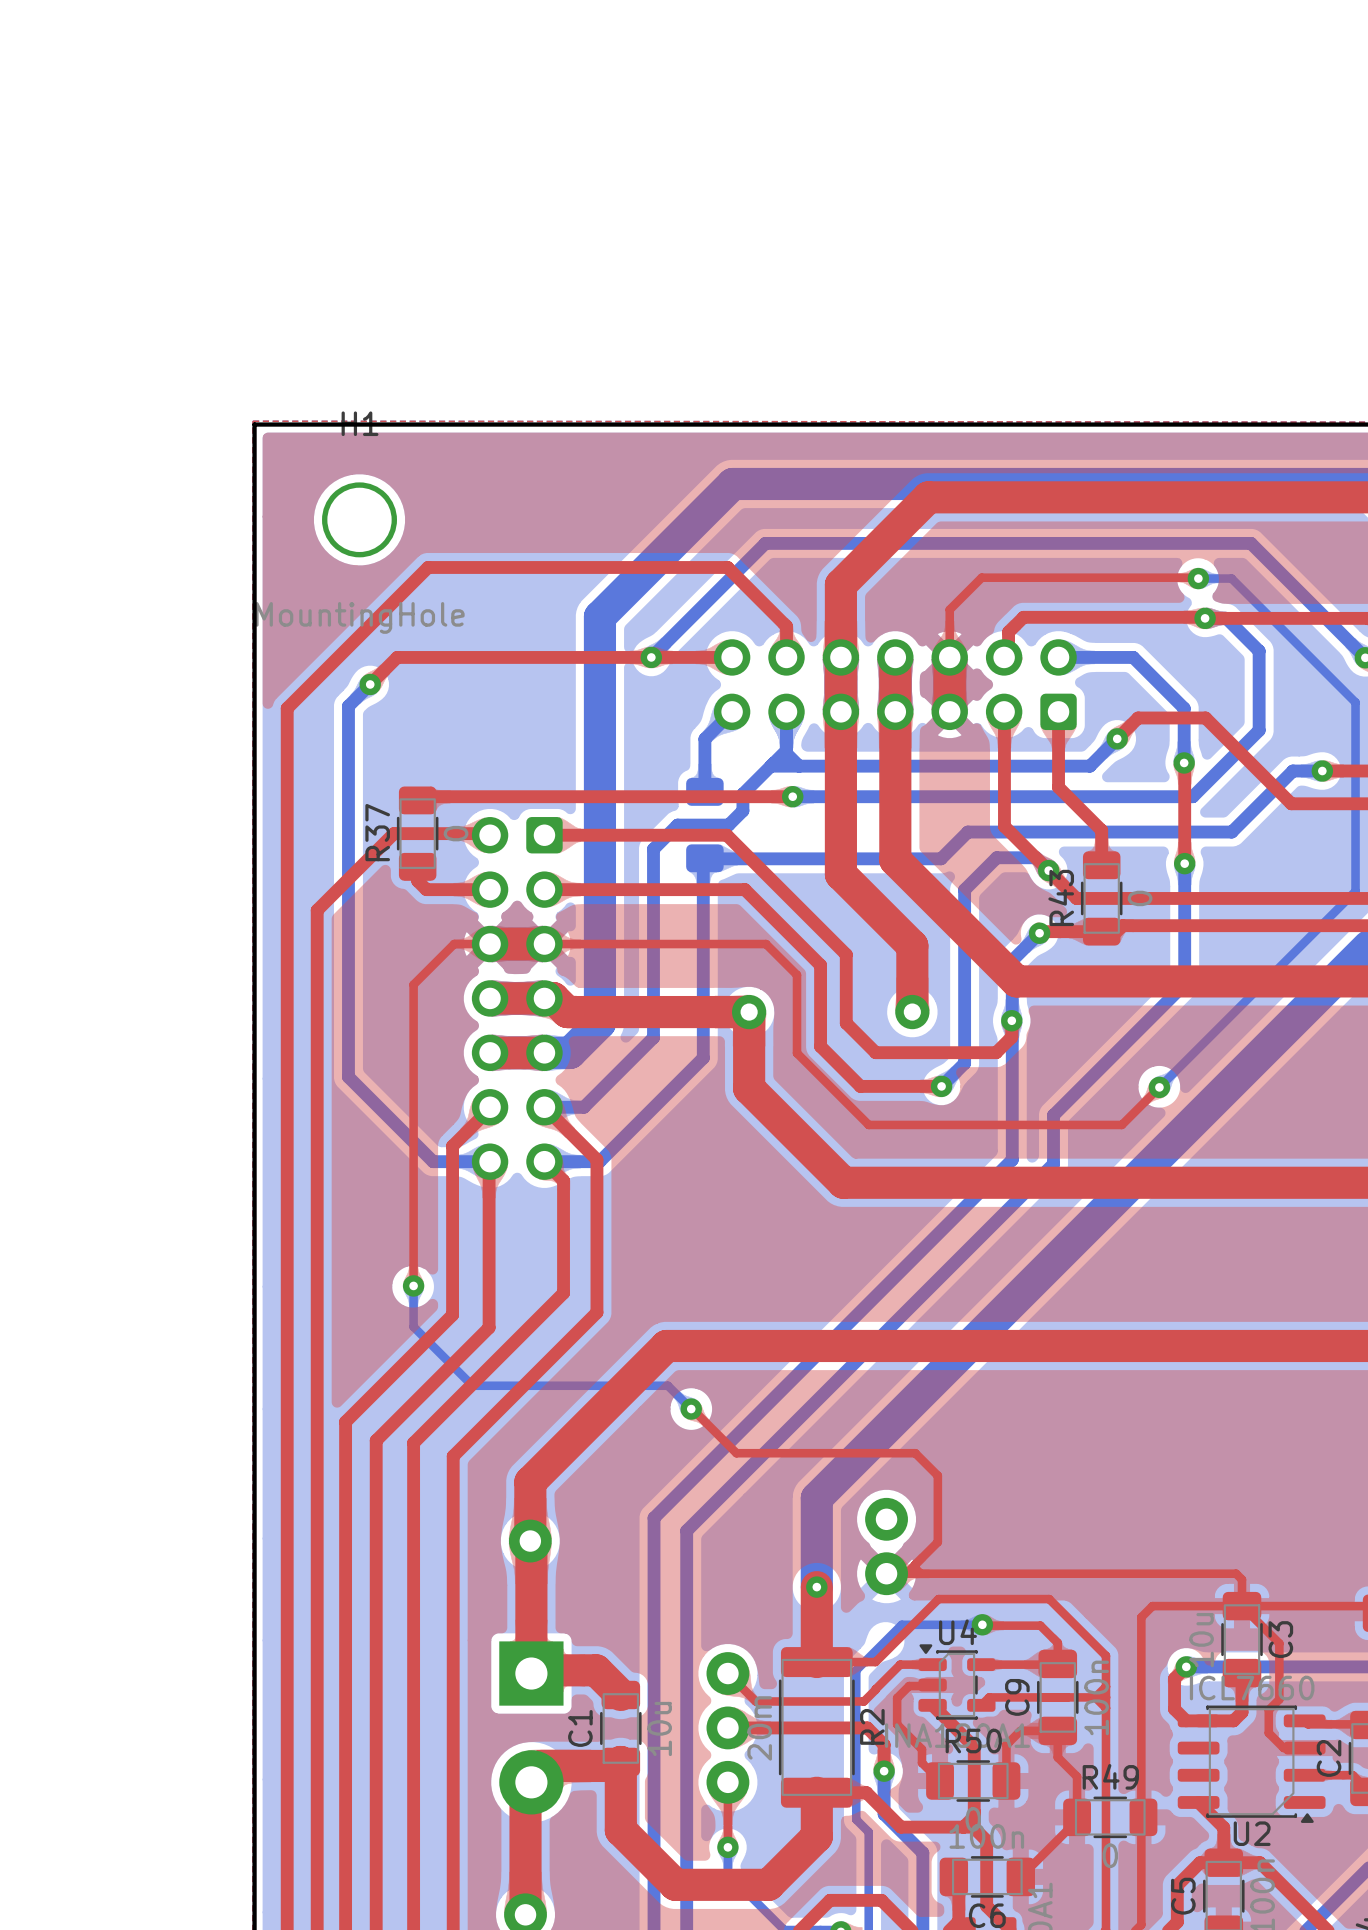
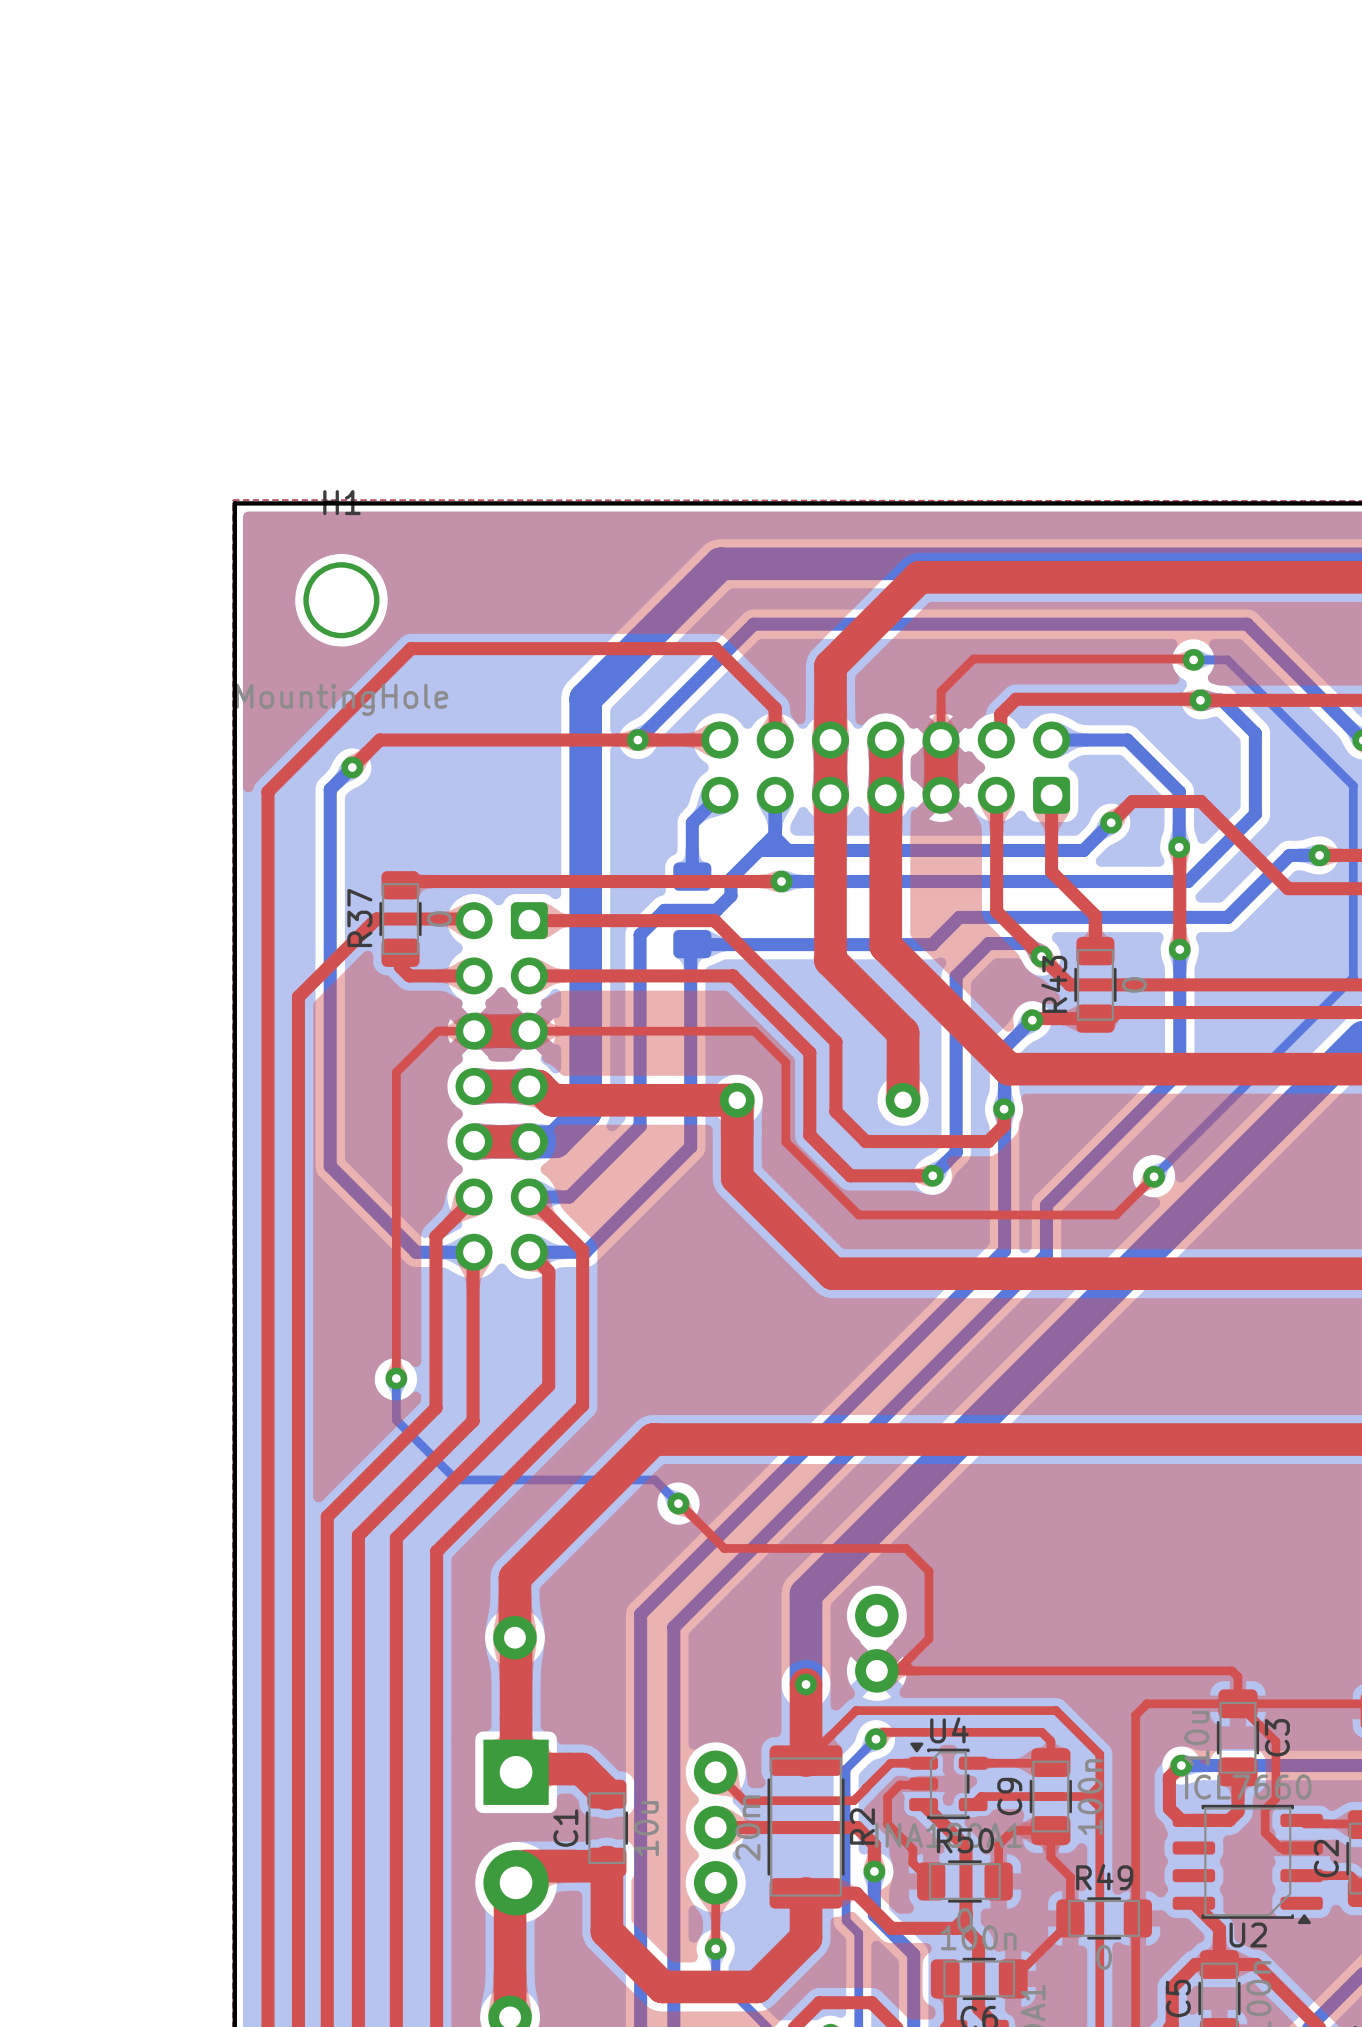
top track: (1062, 1612) (1049, 1599) (938, 1599) (875, 1662) (816, 1662) -> (1056, 1710) (856, 1710) (806, 1760)
bottom track: (982, 1624) (901, 1624) (885, 1640) -> none
top track: (982, 1624) (1040, 1625) (1049, 1634) -> (875, 1739) (882, 1732) (1041, 1732)
via position: (982, 1624) -> (875, 1739)

